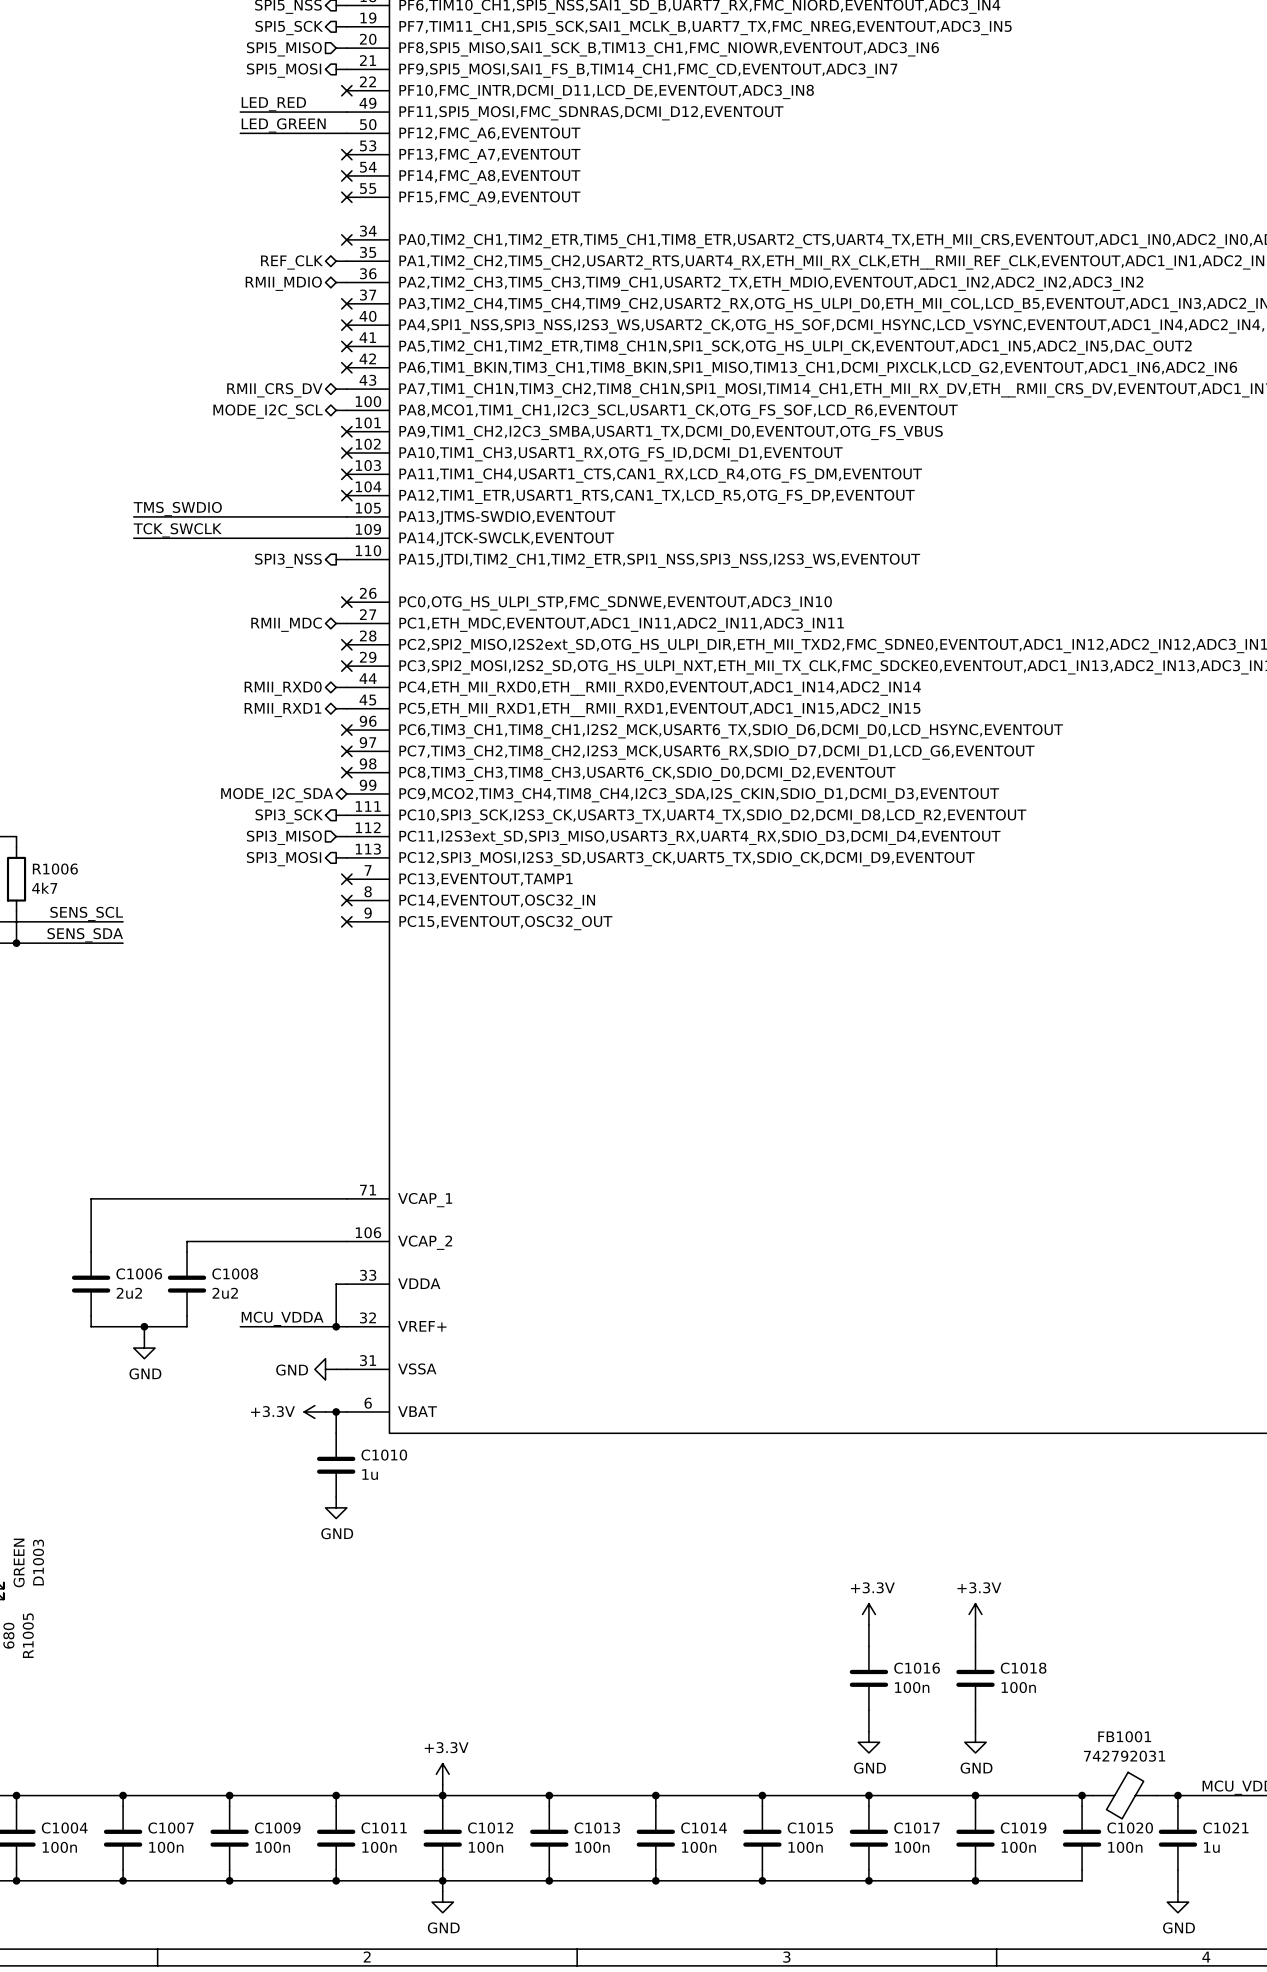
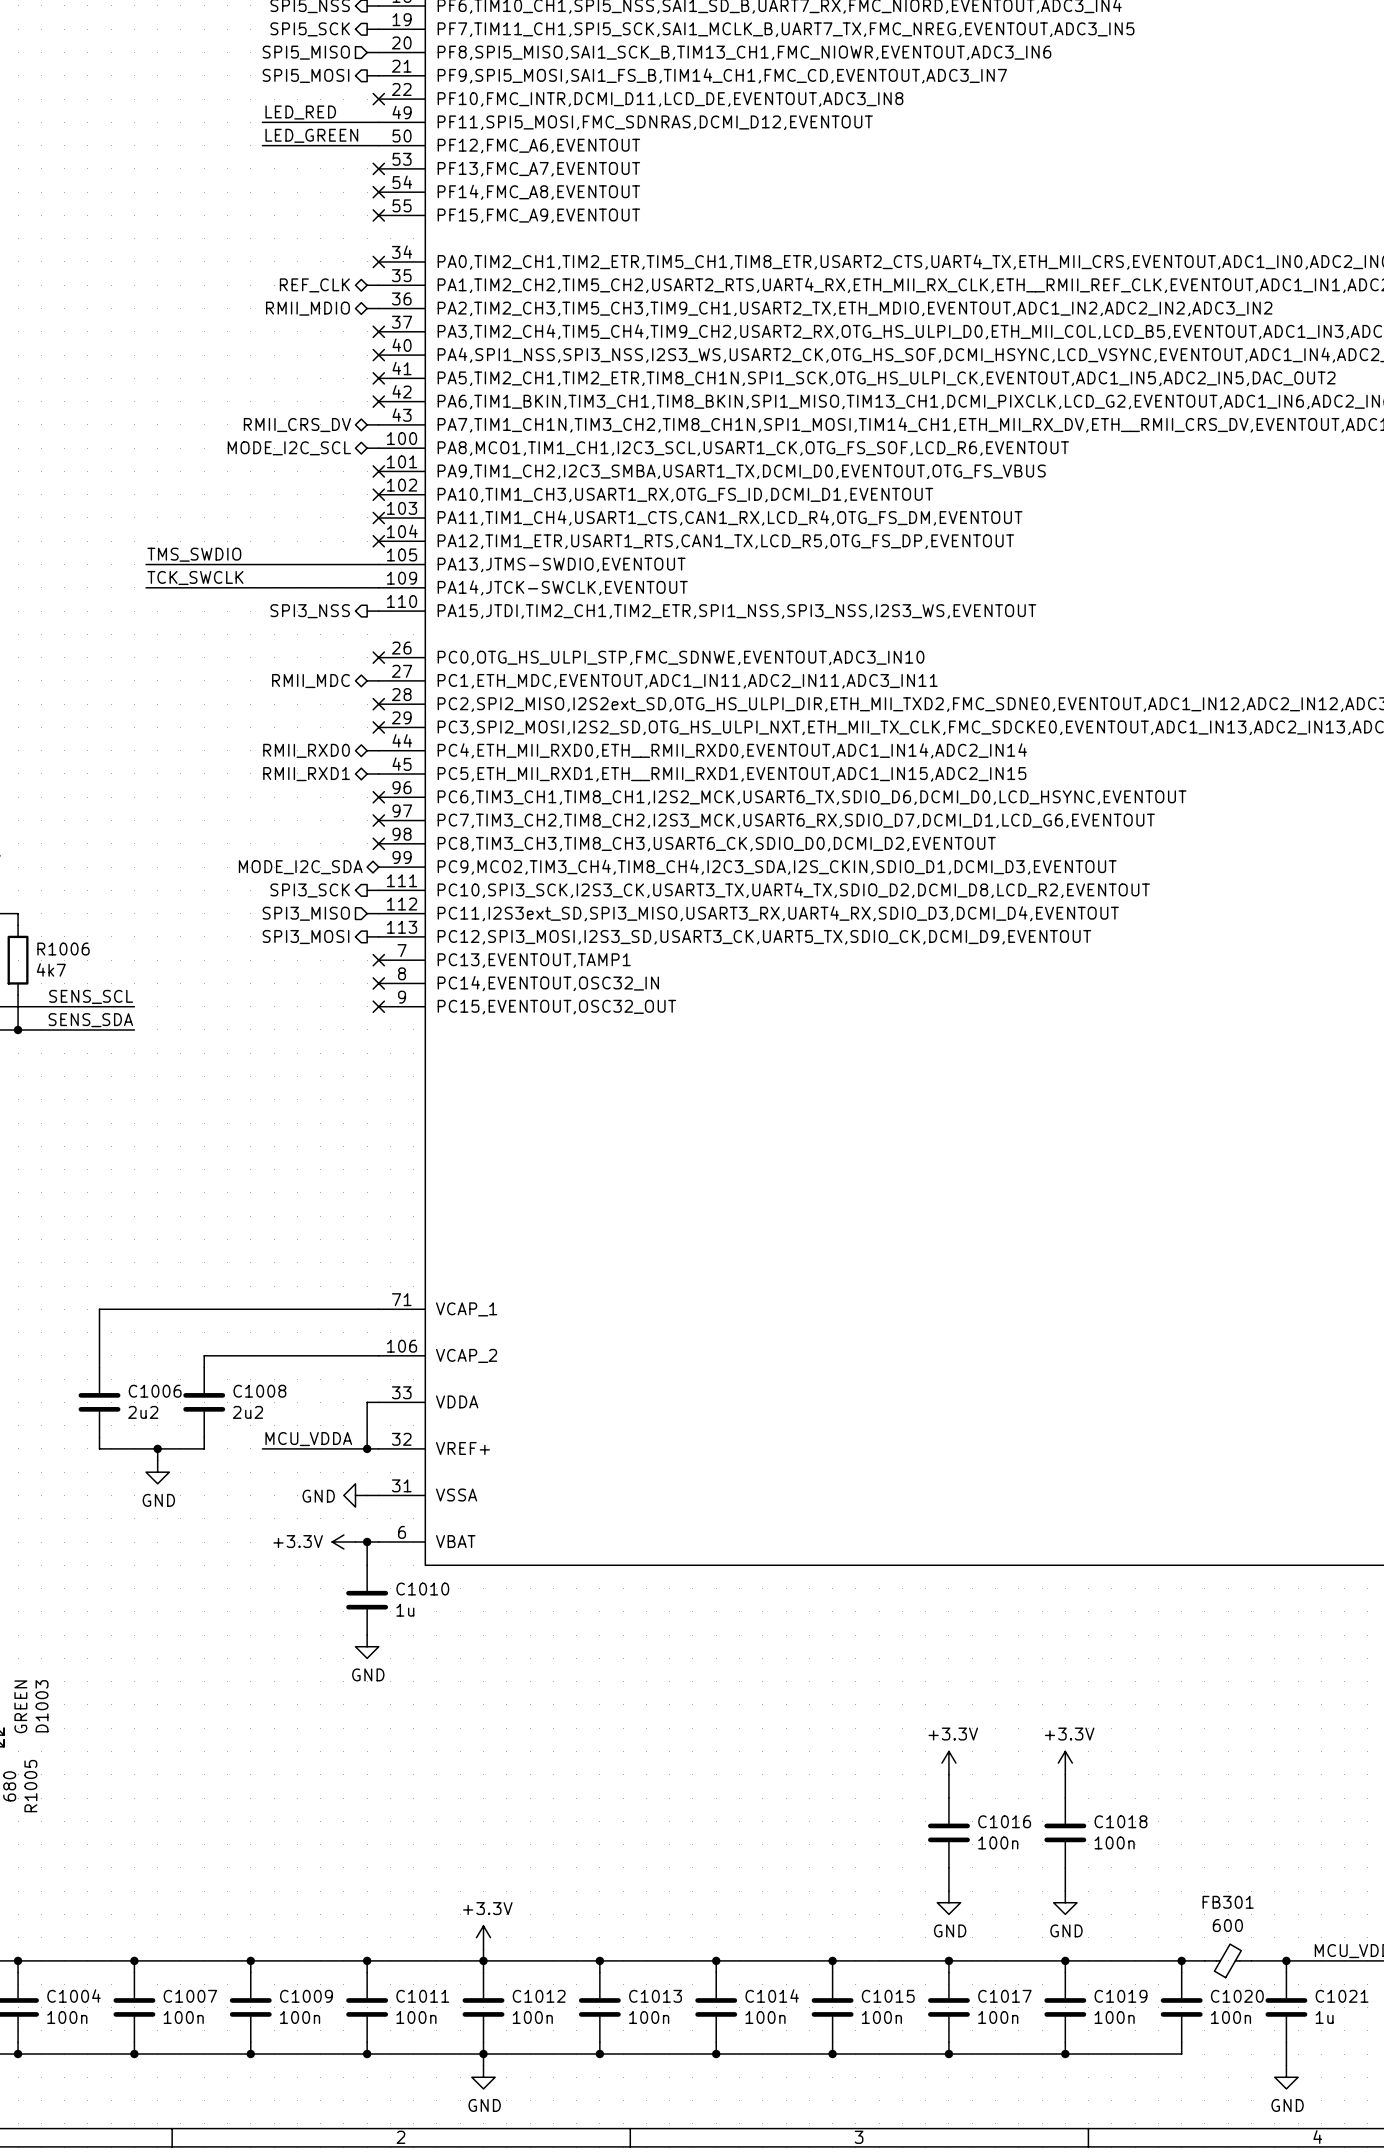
FB1001: 742792031 (1124, 1795) -> none
FB301: none -> 600 (1228, 1960)

